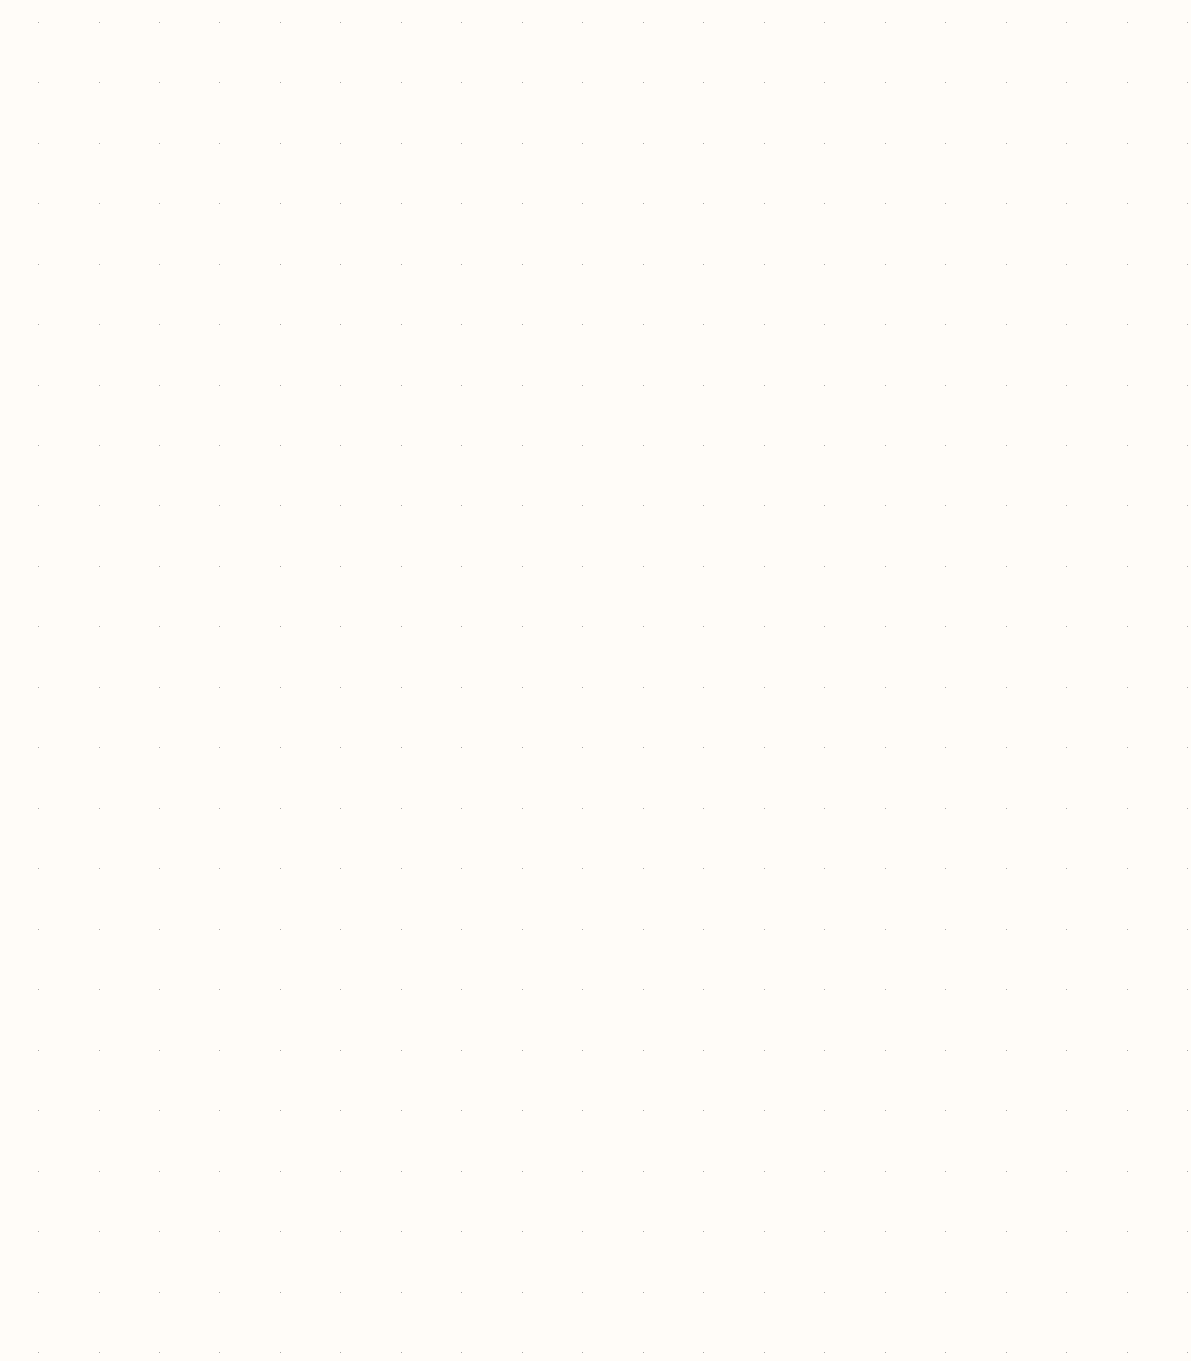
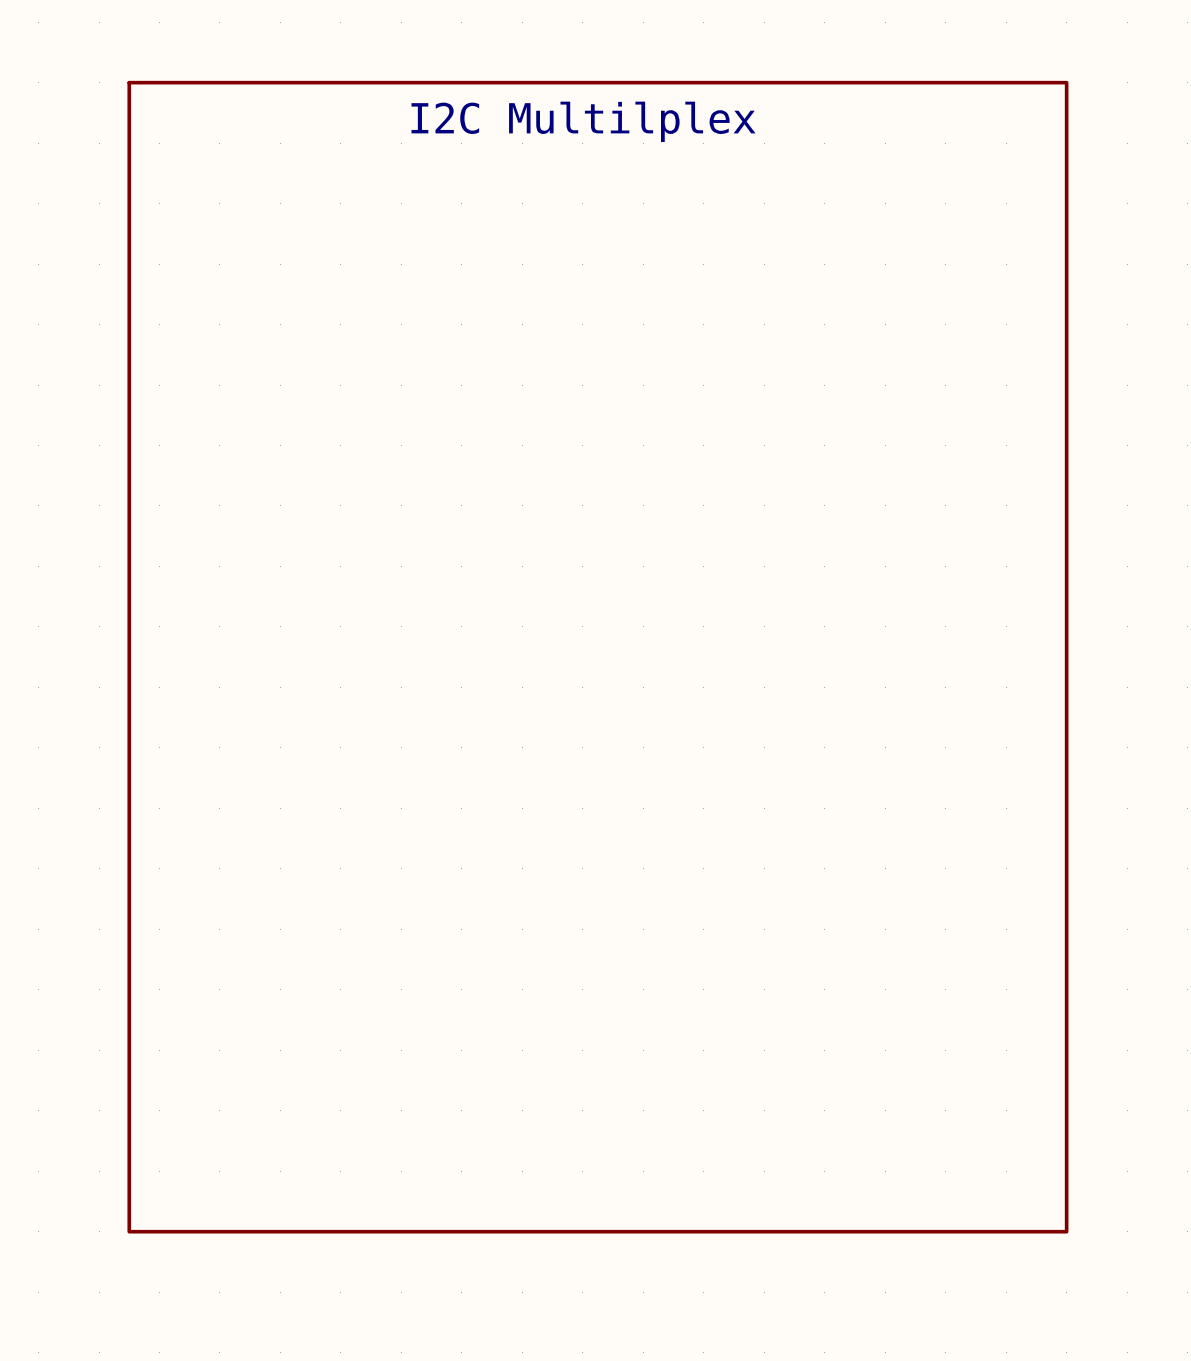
sheet I2C Multilplex: none -> (597, 657)

